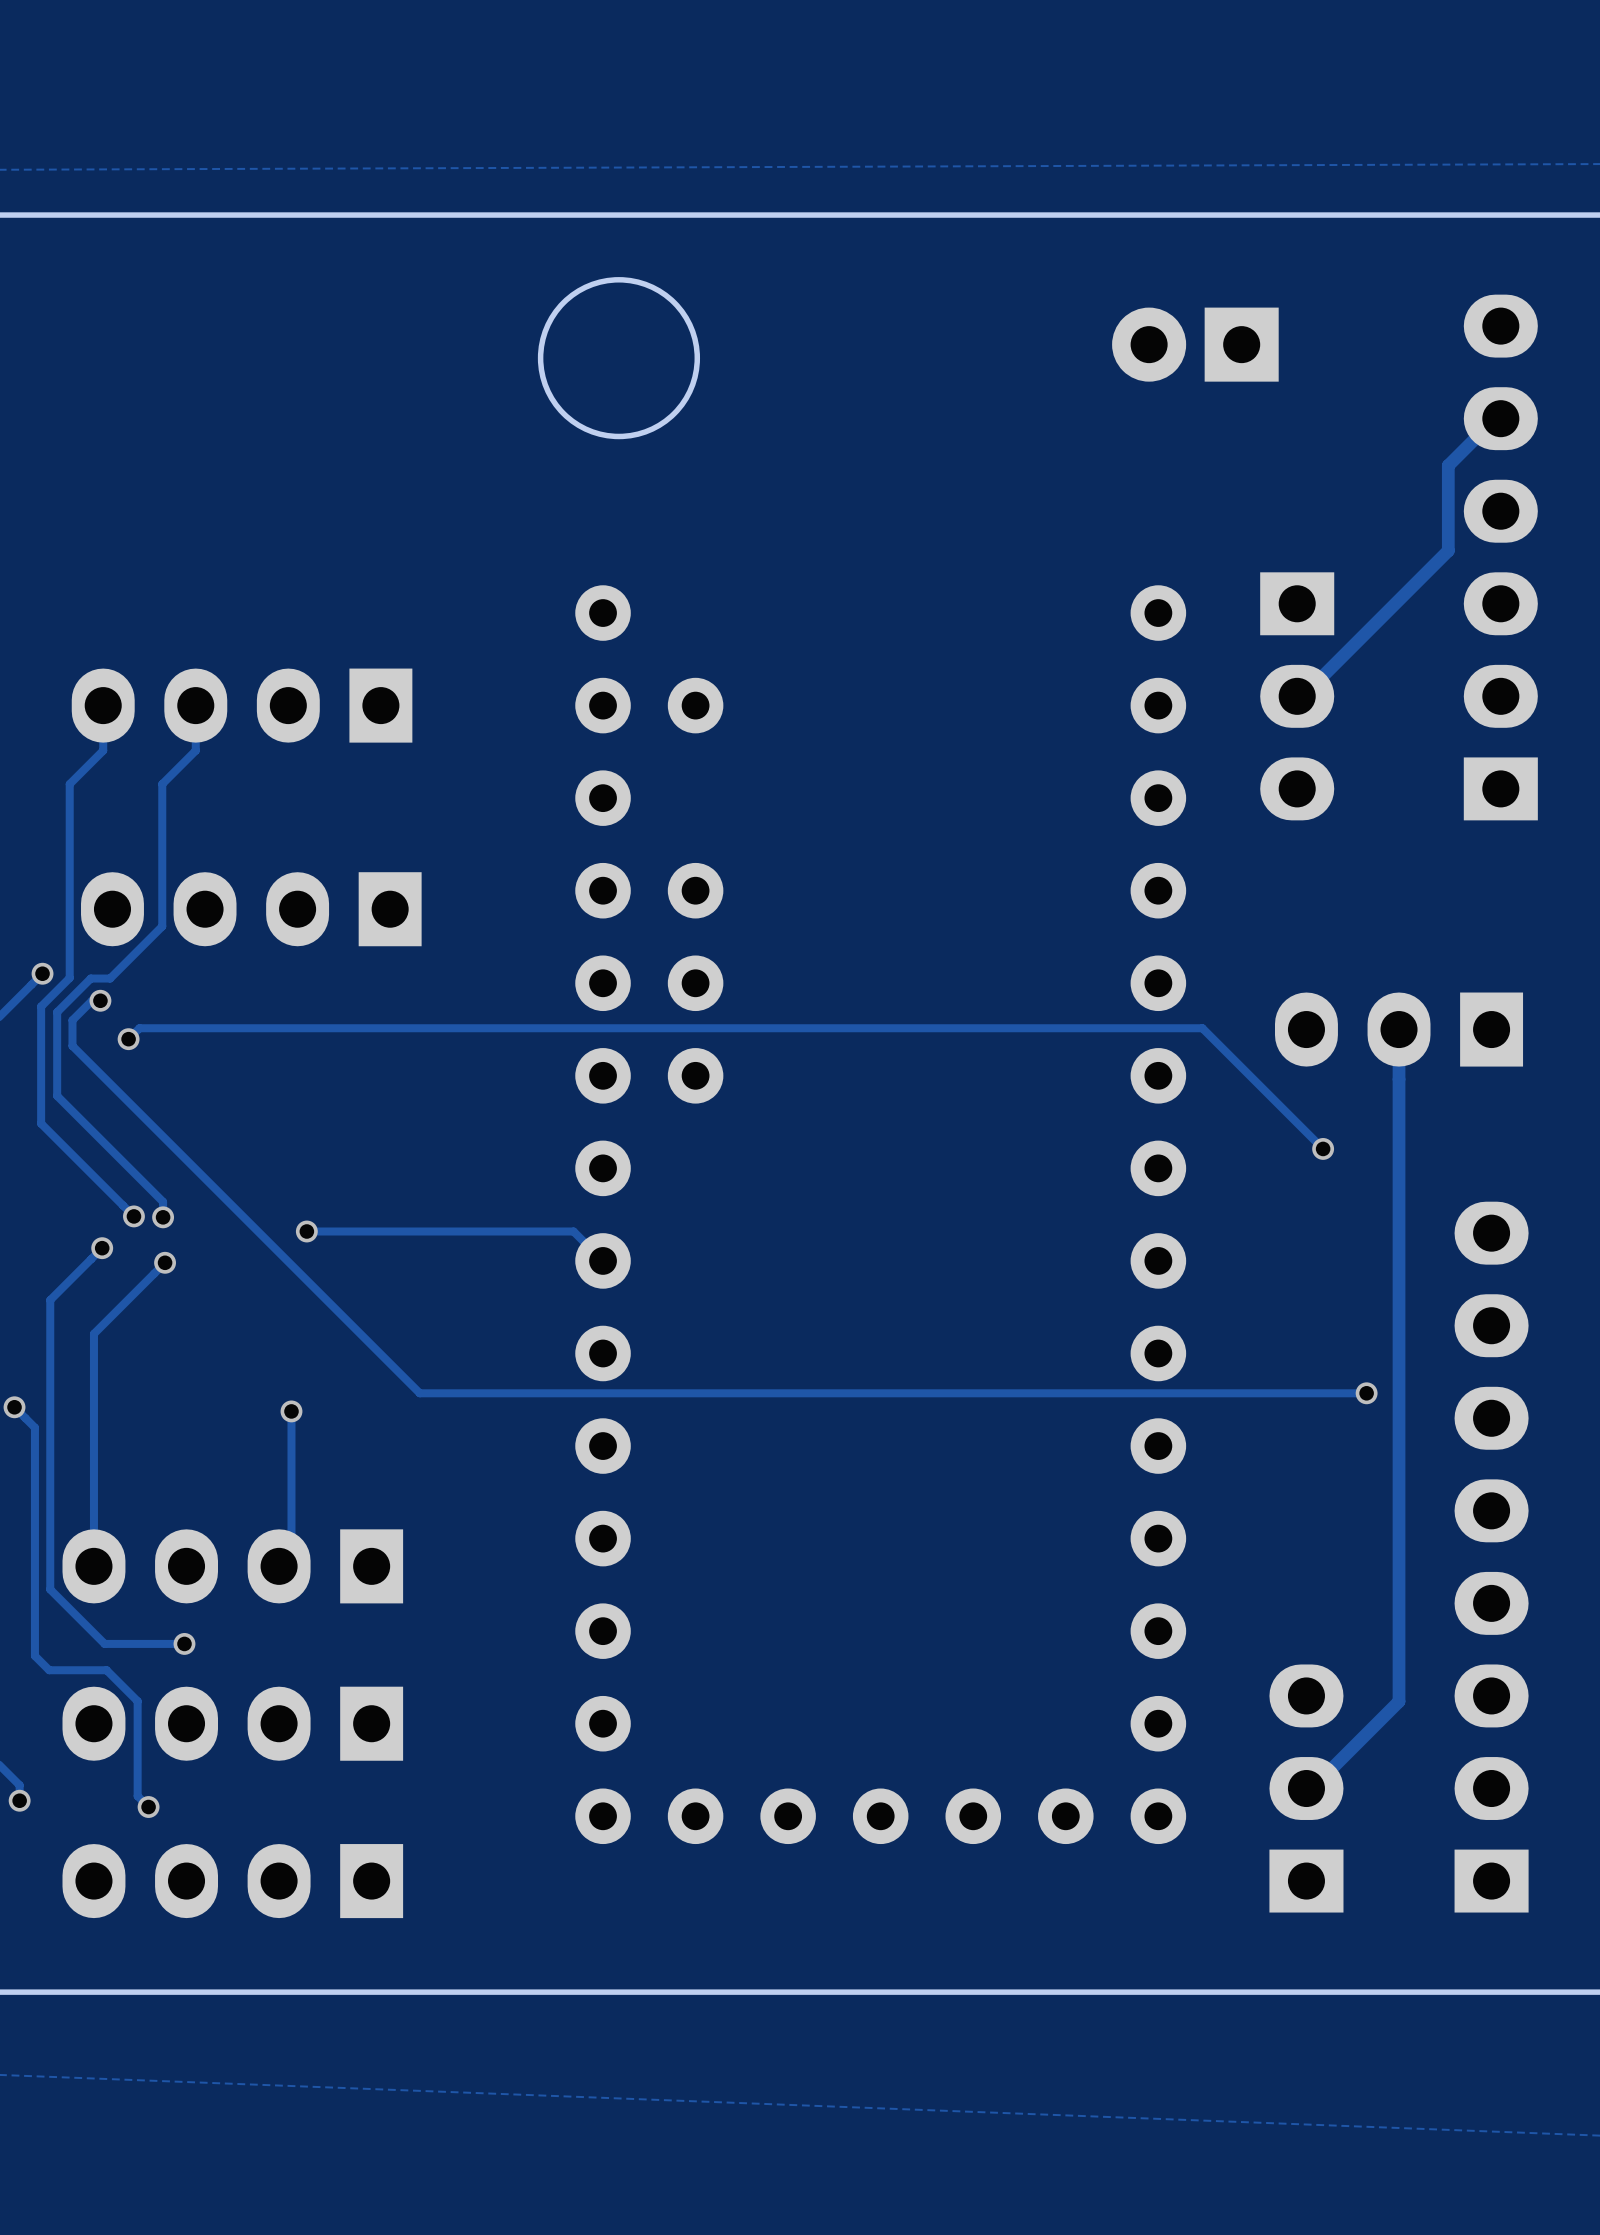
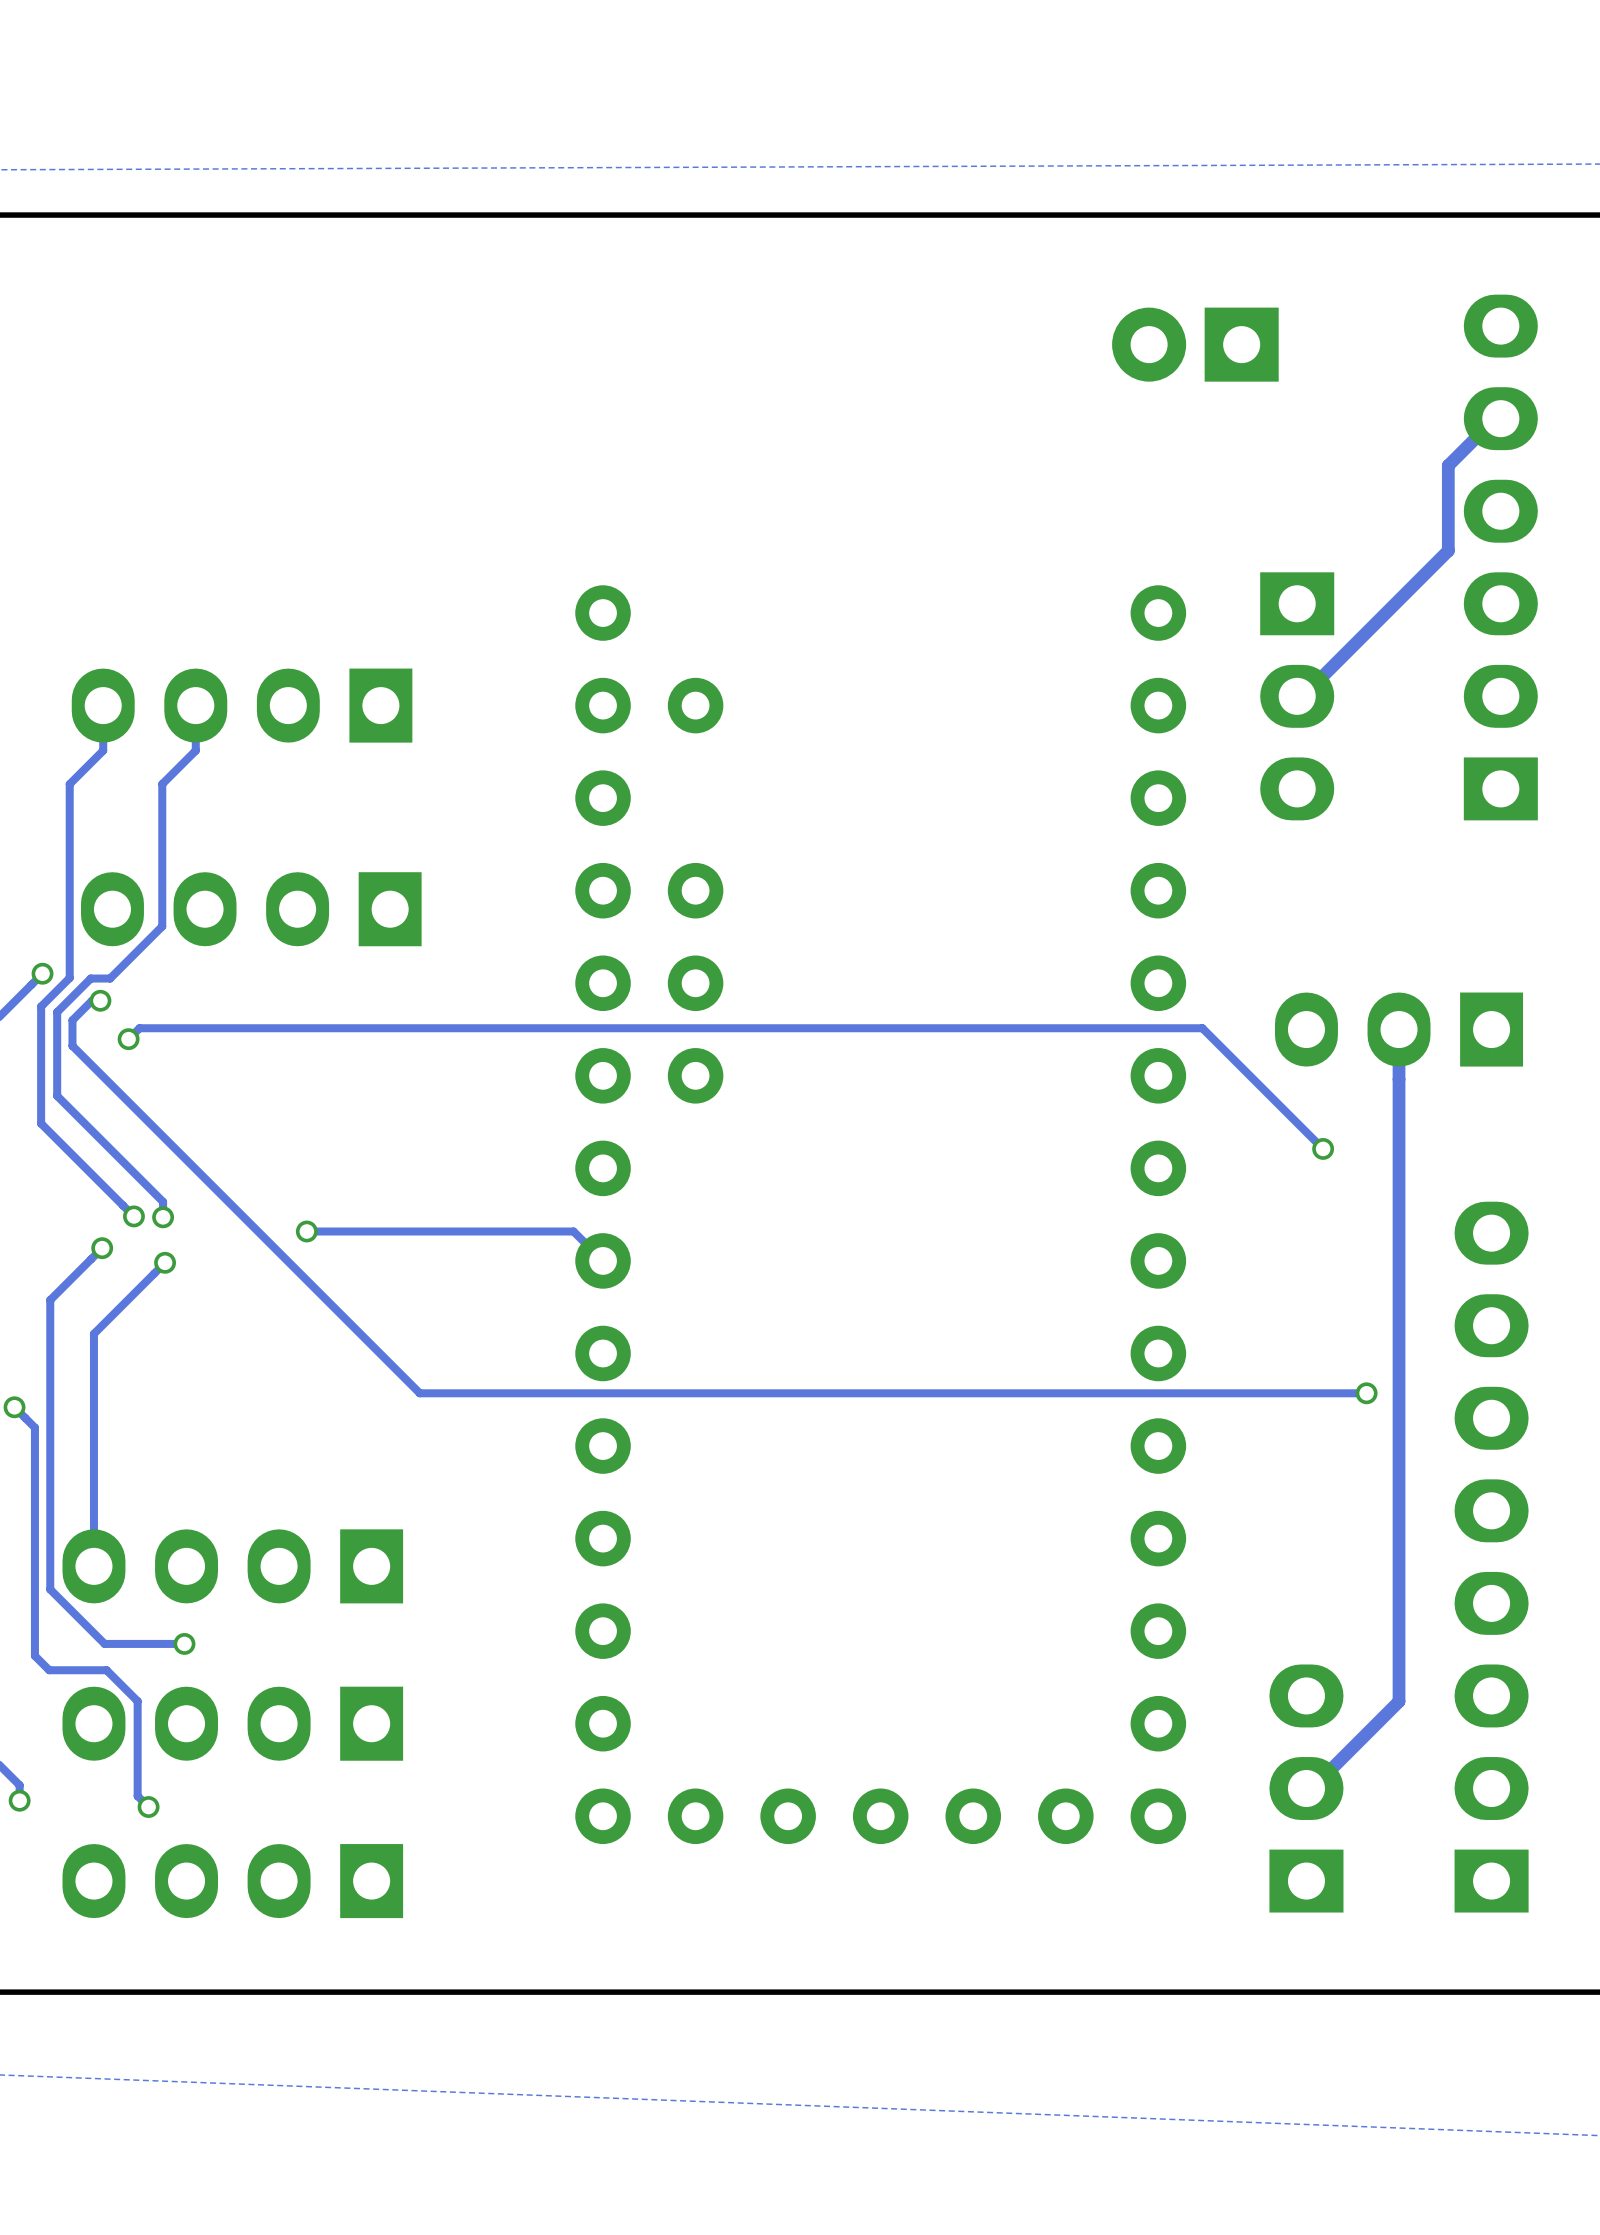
round board edge: [537, 277, 701, 440] -> none
track: (291, 1411) (291, 1553) (279, 1566) -> none
via: (291, 1411) -> none

